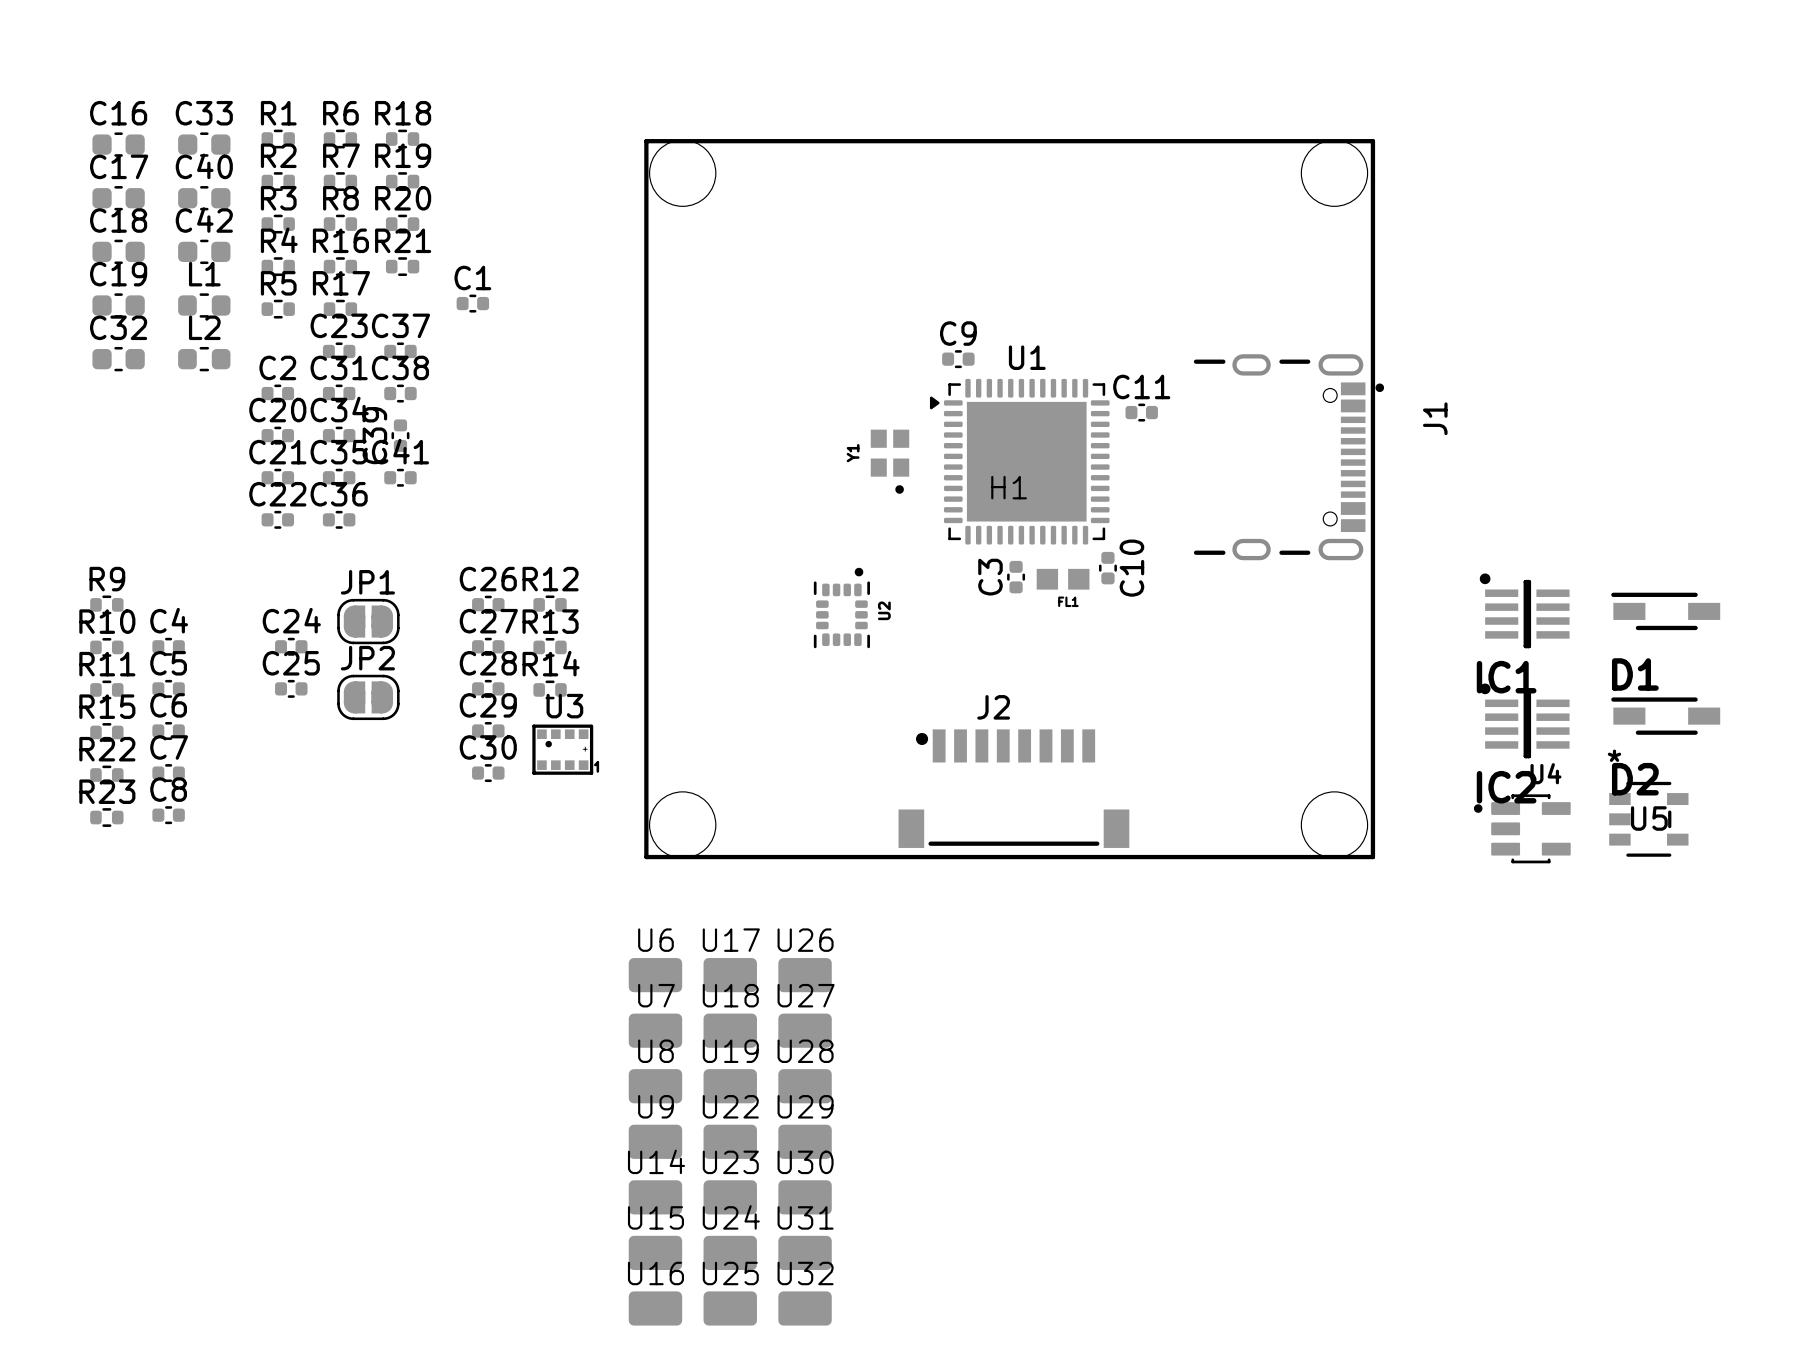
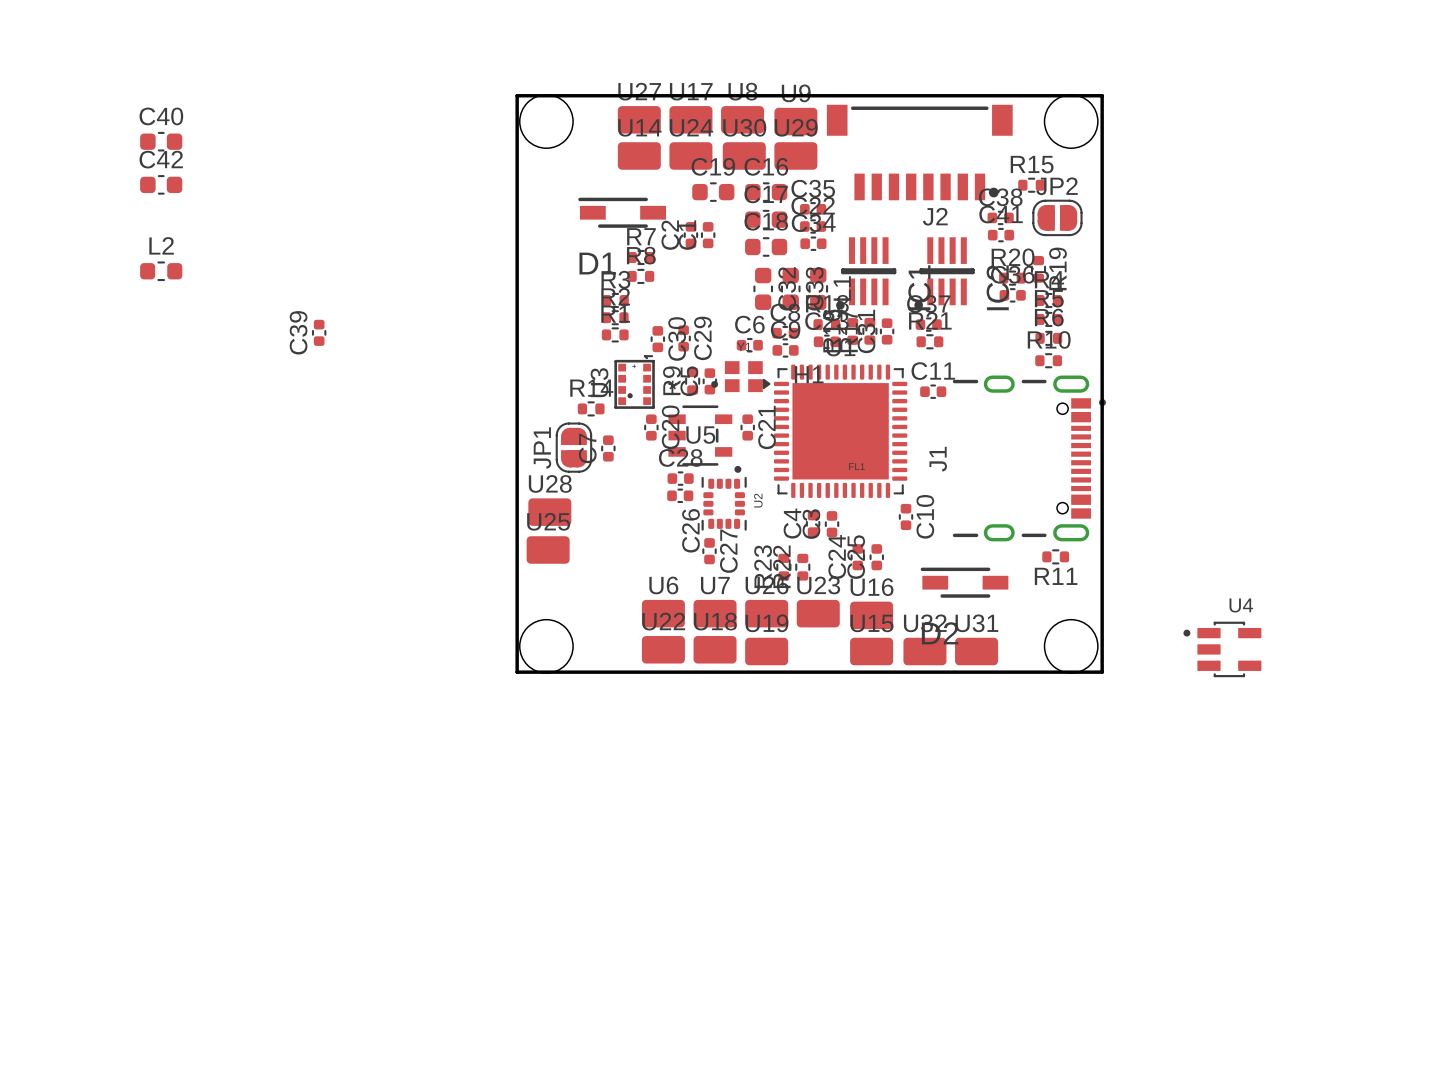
R1 position: (278, 139) -> (615, 334)
R6 position: (340, 139) -> (1048, 338)
R18 position: (402, 139) -> (826, 324)
C16 position: (118, 144) -> (766, 192)
C33 rotation: 0° (204, 144) -> 90° clockwise (790, 288)
C33 position: (204, 144) -> (790, 288)
R2 position: (278, 181) -> (615, 317)
R7 position: (340, 181) -> (641, 257)
R19 rotation: 0° (402, 181) -> 90° clockwise (1038, 269)
R19 position: (402, 181) -> (1038, 269)
C17 position: (118, 198) -> (766, 219)
R3 position: (278, 224) -> (615, 300)
R8 position: (340, 224) -> (640, 276)
R20 position: (402, 224) -> (1012, 278)
C18 position: (118, 251) -> (766, 246)
R4 position: (278, 266) -> (1048, 300)
R16 rotation: 0° (340, 266) -> 90° clockwise (852, 331)
R16 position: (340, 266) -> (852, 331)
R21 position: (402, 266) -> (929, 341)
C1 rotation: 0° (472, 303) -> 90° clockwise (708, 235)
C1 position: (472, 303) -> (708, 235)
C19 position: (118, 305) -> (713, 192)
L1 rotation: 0° (204, 305) -> 90° clockwise (818, 288)
L1 position: (204, 305) -> (818, 288)
R5 position: (278, 309) -> (1048, 319)
R17 rotation: 0° (340, 309) -> 90° clockwise (869, 331)
R17 position: (340, 309) -> (869, 331)
C23 position: (339, 351) -> (826, 341)
C37 position: (400, 351) -> (928, 324)
C32 rotation: 0° (118, 359) -> 90° clockwise (763, 288)
C32 position: (118, 359) -> (763, 288)
C9 position: (958, 359) -> (785, 350)
C2 rotation: 0° (277, 393) -> 90° clockwise (690, 235)
C2 position: (277, 393) -> (690, 235)
C31 rotation: 0° (339, 393) -> 90° clockwise (887, 331)
C31 position: (339, 393) -> (887, 331)
C38 position: (400, 393) -> (1000, 217)
C11 position: (1141, 412) -> (933, 391)
J1 name position: J1 (1435, 418) -> J1 (938, 459)
C20 rotation: 0° (277, 435) -> 90° clockwise (651, 427)
C20 position: (277, 435) -> (651, 427)
C34 position: (339, 435) -> (813, 243)
J1 position: (1288, 457) -> (1029, 458)
Y1 rotation: 0° (889, 461) -> 90° clockwise (736, 376)
Y1 position: (889, 461) -> (736, 376)
U1 position: (1019, 461) -> (835, 431)
C21 rotation: 0° (277, 477) -> 90° clockwise (747, 427)
C21 position: (277, 477) -> (747, 427)
C35 position: (339, 477) -> (813, 209)
C41 position: (400, 477) -> (1000, 235)
C22 position: (277, 519) -> (813, 226)
C36 position: (339, 519) -> (1012, 295)
C10 position: (1107, 568) -> (906, 516)
C3 position: (1016, 577) -> (832, 524)
C26 name rotation: 0° (488, 579) -> 90° counterclockwise (690, 530)
JP1 name position: JP1 (367, 582) -> JP1 (542, 448)
R9 rotation: 0° (106, 604) -> 90° clockwise (692, 381)
R9 position: (106, 604) -> (692, 381)
C26 position: (488, 604) -> (680, 495)
R12: (550, 604) -> none
U2 position: (841, 608) -> (724, 498)
IC1 rotation: 0° (1524, 610) -> 90° counterclockwise (866, 273)
IC1 position: (1524, 610) -> (866, 273)
D1 position: (1665, 611) -> (622, 212)
JP1 rotation: 0° (368, 621) -> 90° clockwise (573, 447)
JP1 position: (368, 621) -> (573, 447)
C4 rotation: 0° (168, 646) -> 90° clockwise (813, 523)
C4 position: (168, 646) -> (813, 523)
C24 rotation: 0° (291, 646) -> 90° clockwise (857, 557)
C24 position: (291, 646) -> (857, 557)
C27 rotation: 0° (488, 646) -> 90° clockwise (709, 551)
C27 position: (488, 646) -> (709, 551)
R10 position: (106, 647) -> (1048, 360)
R13: (550, 647) -> none
R11 name position: R11 (107, 664) -> R11 (1056, 576)
C5 rotation: 0° (168, 688) -> 90° clockwise (709, 381)
C5 position: (168, 688) -> (709, 381)
C25 rotation: 0° (291, 688) -> 90° clockwise (876, 557)
C25 position: (291, 688) -> (876, 557)
C28 position: (488, 688) -> (680, 478)
R11 position: (106, 689) -> (1055, 556)
R14 position: (550, 689) -> (591, 408)
JP2 position: (368, 697) -> (1057, 217)
D2 position: (1665, 716) -> (964, 582)
IC2 rotation: 0° (1524, 720) -> 90° counterclockwise (944, 273)
IC2 position: (1524, 720) -> (944, 273)
C6 position: (168, 730) -> (749, 345)
C29 rotation: 0° (488, 730) -> 90° clockwise (683, 338)
C29 position: (488, 730) -> (683, 338)
R15 position: (106, 732) -> (1031, 185)
U3 rotation: 0° (565, 749) -> 90° counterclockwise (634, 382)
U3 position: (565, 749) -> (634, 382)
C7 rotation: 0° (168, 773) -> 90° clockwise (608, 448)
C7 position: (168, 773) -> (608, 448)
C30 rotation: 0° (488, 773) -> 90° clockwise (657, 339)
C30 position: (488, 773) -> (657, 339)
R22 rotation: 0° (106, 774) -> 90° clockwise (802, 567)
R22 position: (106, 774) -> (802, 567)
J2 rotation: 0° (1013, 788) -> 180° (919, 152)
J2 position: (1013, 788) -> (919, 152)
C8 position: (168, 815) -> (785, 333)
R23 rotation: 0° (106, 817) -> 90° clockwise (783, 567)
R23 position: (106, 817) -> (783, 567)
U5 position: (1648, 819) -> (700, 435)
U6 position: (655, 975) -> (663, 613)
U17 position: (730, 975) -> (690, 119)
U26 position: (805, 975) -> (766, 613)
U7 position: (655, 1030) -> (715, 613)
U18 position: (730, 1030) -> (715, 649)
U27 position: (805, 1030) -> (639, 119)
U8 position: (655, 1086) -> (742, 119)
U19 position: (730, 1086) -> (766, 651)
U28 position: (805, 1086) -> (549, 512)
U9 position: (655, 1141) -> (795, 121)
U22 position: (730, 1141) -> (663, 649)
U29 position: (805, 1141) -> (795, 155)
U14 position: (655, 1197) -> (639, 155)
U23 position: (730, 1197) -> (818, 613)
U30 position: (805, 1197) -> (744, 155)
U15 position: (655, 1252) -> (871, 651)
U24 position: (730, 1252) -> (690, 155)
U31 position: (805, 1252) -> (976, 651)
U16 position: (655, 1308) -> (871, 615)
U25 position: (730, 1308) -> (548, 549)
U32 position: (805, 1308) -> (924, 651)

